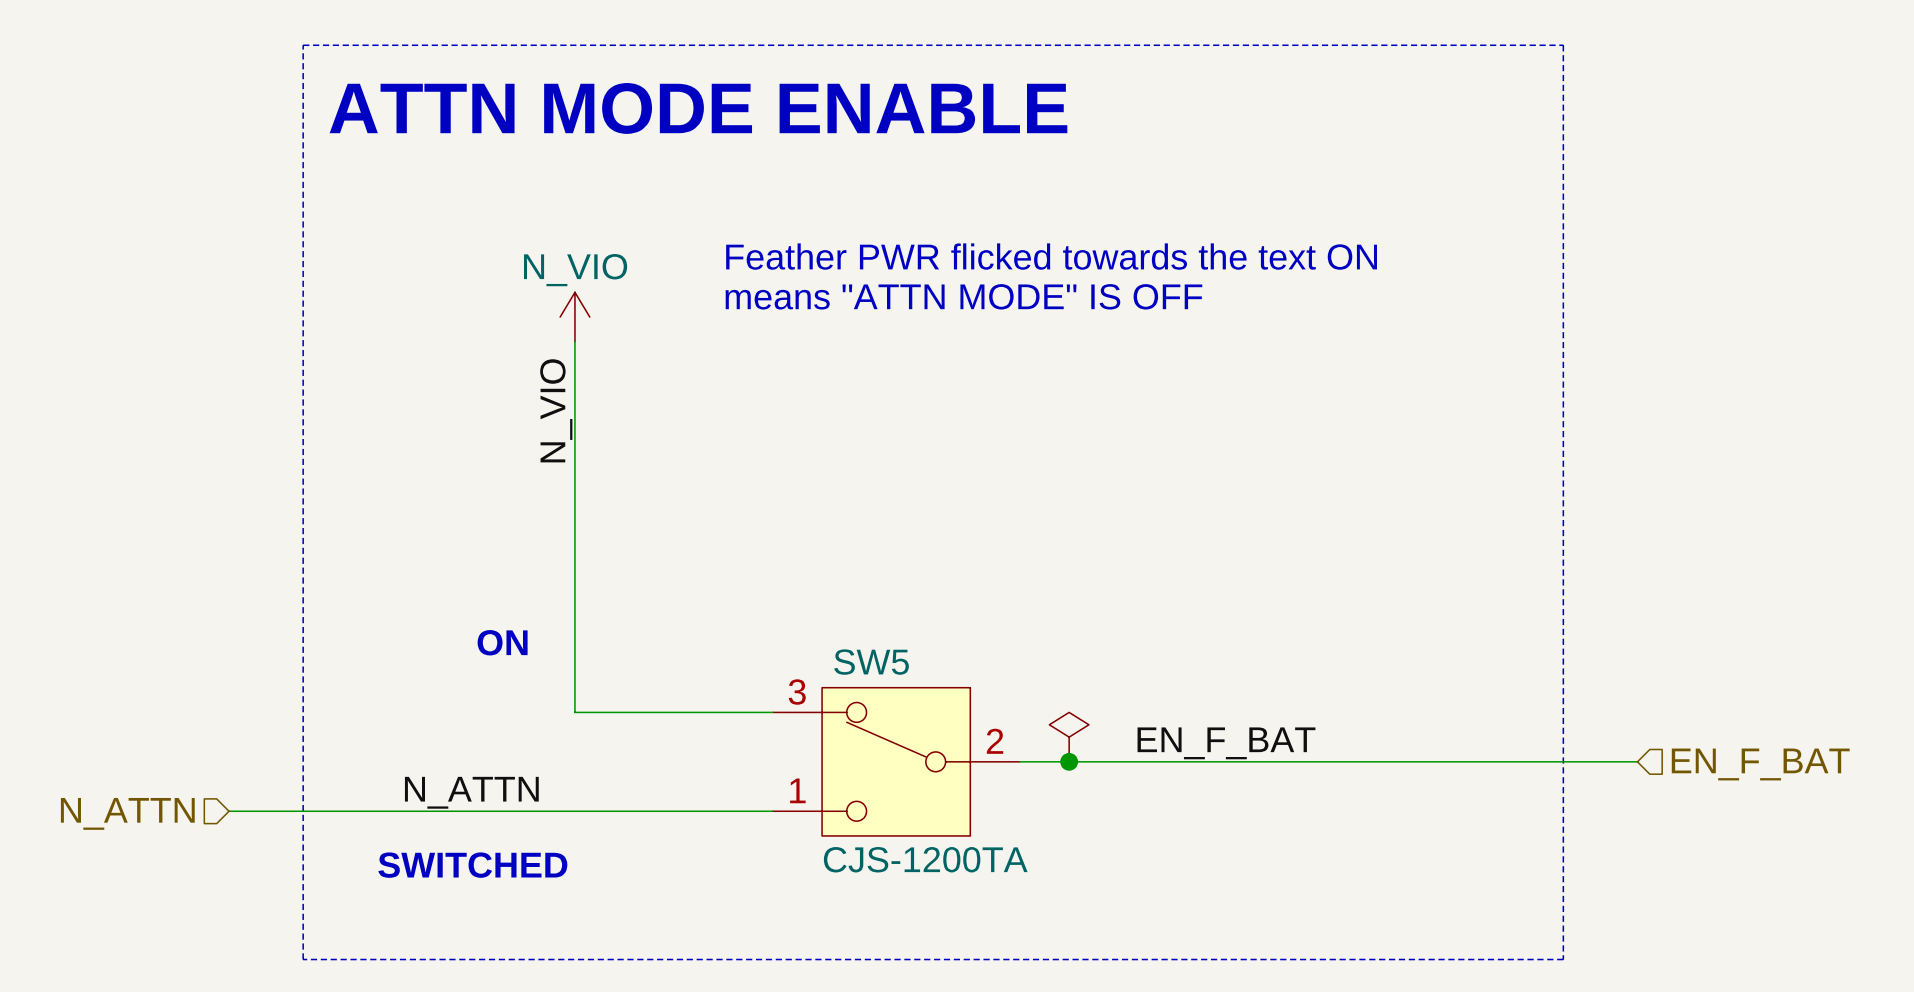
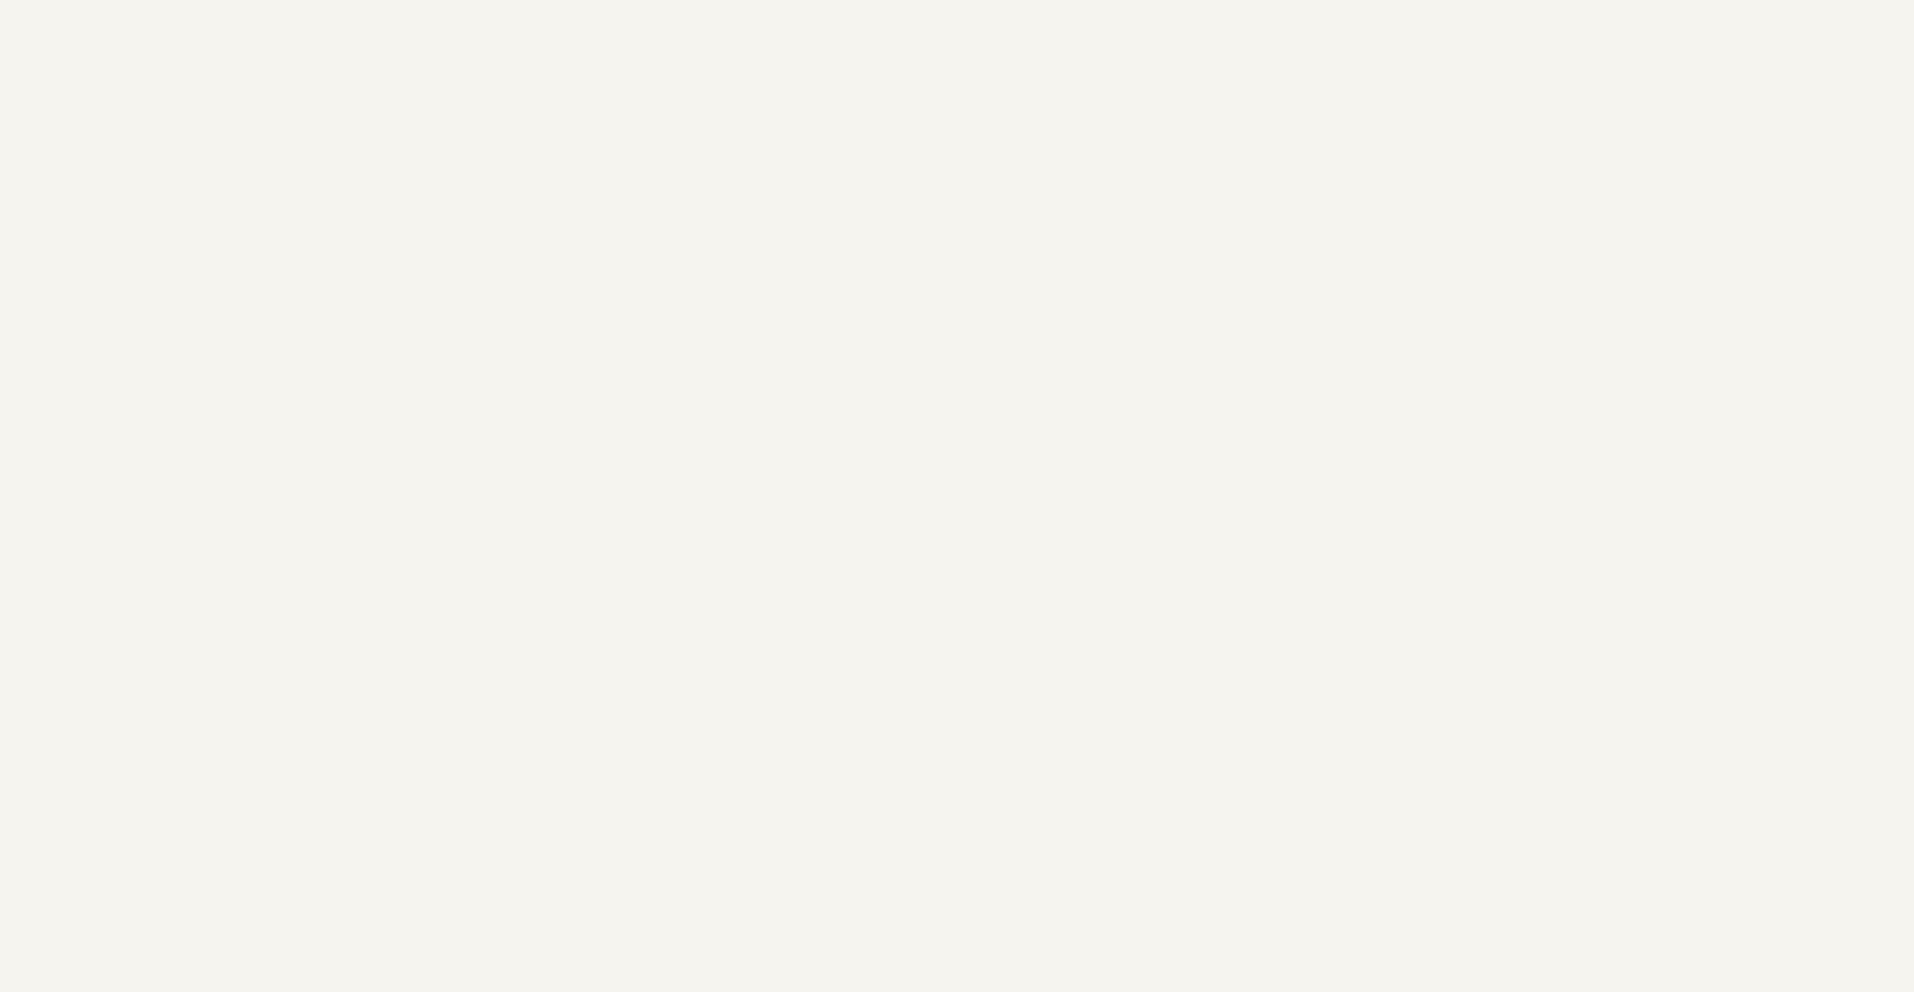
line: (303, 45) (1563, 45) (1563, 959) (303, 959) (303, 45) -> none
text: ATTN MODE ENABLE (698, 108) -> none
text: Feather PWR flicked towards the text ON (1051, 256) -> none
text: means "ATTN MODE" IS OFF (963, 296) -> none
power symbol: N_VIO (574, 317) -> none
wire: (574, 341) (574, 712) (772, 712) -> none
label: N_VIO (556, 410) -> none
text: ON (502, 642) -> none
power symbol: (1069, 737) -> none
label: EN_F_BAT (1226, 743) -> none
SW5: CJS-1200TA (896, 761) -> none
wire: (1019, 761) (1637, 761) -> none
junction: (1069, 761) -> none
hierarchical label: EN_F_BAT (1760, 764) -> none
label: N_ATTN (471, 792) -> none
wire: (229, 811) (772, 811) -> none
hierarchical label: N_ATTN (127, 813) -> none
text: SWITCHED (472, 865) -> none

